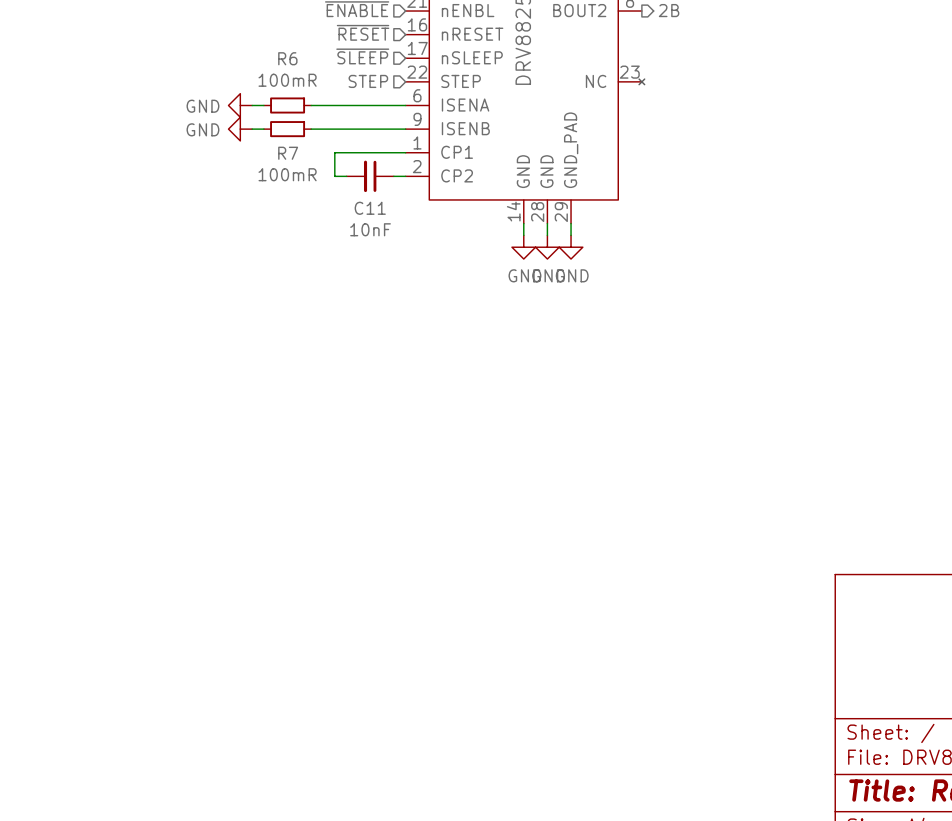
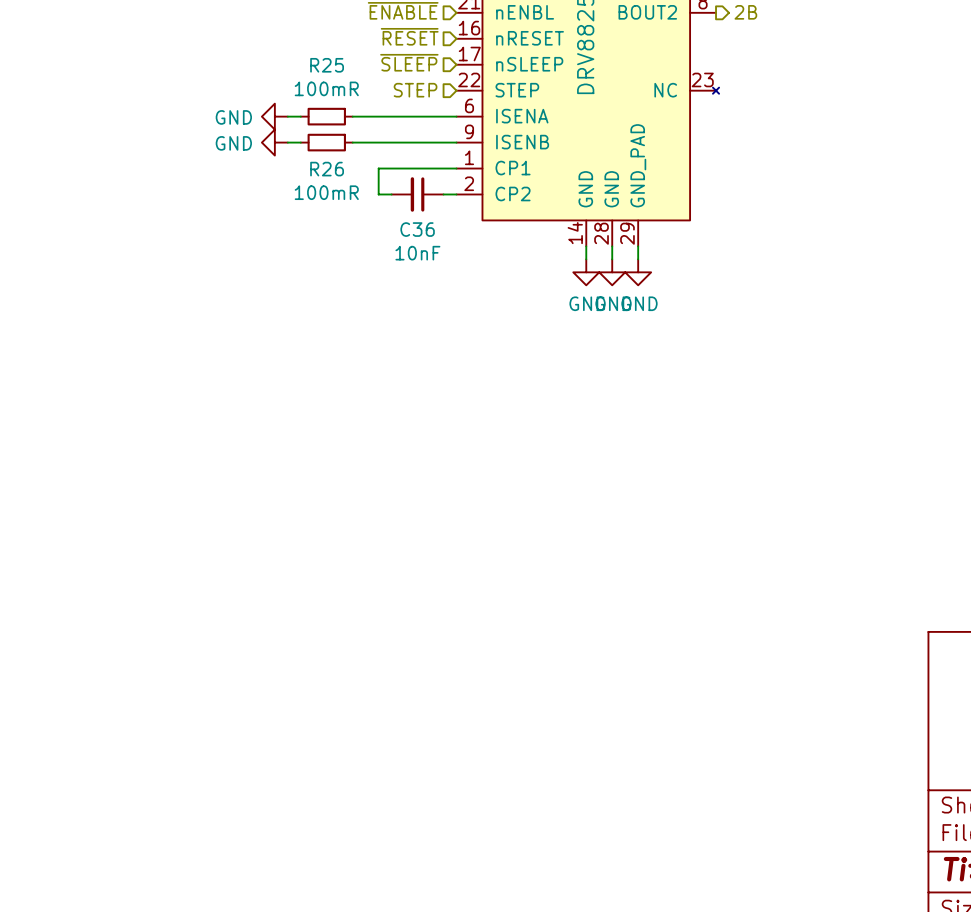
R6 name: R6 (287, 58) -> R25 (327, 65)
R7 name: R7 (288, 153) -> R26 (327, 169)
C11 name: C11 (370, 208) -> C36 (417, 229)

